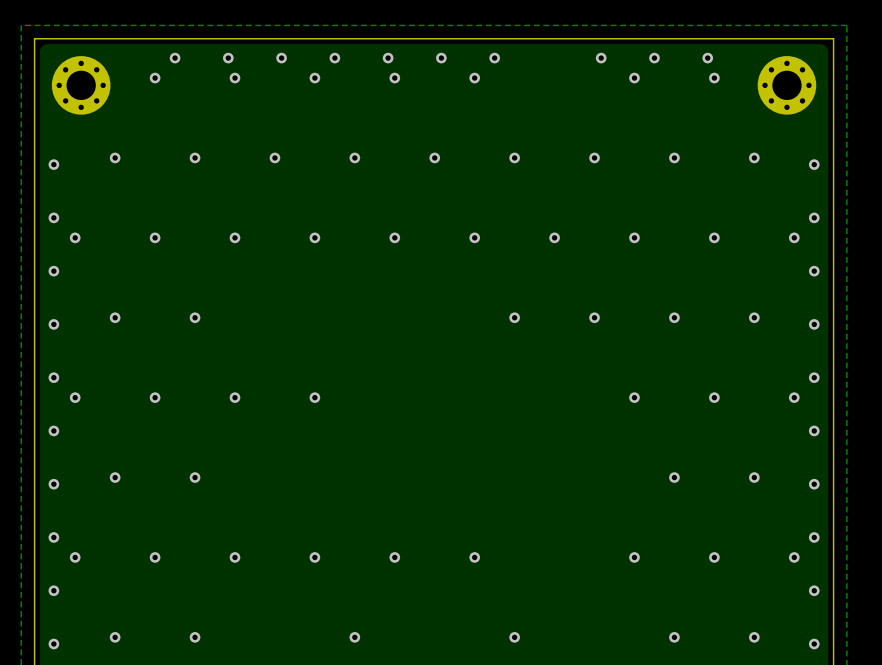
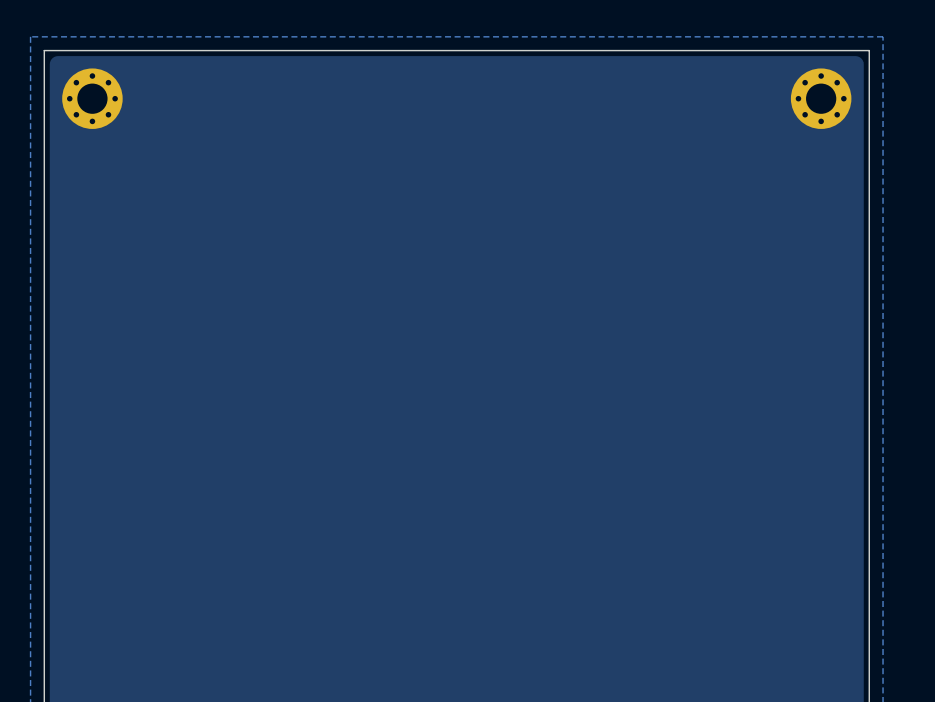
via: (175, 58) -> none
via: (228, 58) -> none
via: (281, 58) -> none
via: (334, 58) -> none
via: (388, 58) -> none
via: (441, 58) -> none
via: (494, 58) -> none
via: (601, 58) -> none
via: (654, 58) -> none
via: (707, 58) -> none
via: (155, 78) -> none
via: (234, 78) -> none
via: (314, 78) -> none
via: (394, 78) -> none
via: (474, 78) -> none
via: (634, 78) -> none
via: (714, 78) -> none
via: (115, 157) -> none
via: (195, 157) -> none
via: (274, 157) -> none
via: (354, 157) -> none
via: (434, 157) -> none
via: (514, 157) -> none
via: (594, 157) -> none
via: (674, 157) -> none
via: (754, 157) -> none
via: (53, 164) -> none
via: (814, 164) -> none
via: (53, 217) -> none
via: (814, 217) -> none
via: (75, 237) -> none
via: (155, 237) -> none
via: (234, 237) -> none
via: (314, 237) -> none
via: (394, 237) -> none
via: (474, 237) -> none
via: (554, 237) -> none
via: (634, 237) -> none
via: (714, 237) -> none
via: (794, 237) -> none
via: (53, 271) -> none
via: (814, 271) -> none
via: (115, 317) -> none
via: (195, 317) -> none
via: (514, 317) -> none
via: (594, 317) -> none
via: (674, 317) -> none
via: (754, 317) -> none
via: (53, 324) -> none
via: (814, 324) -> none
via: (53, 377) -> none
via: (814, 377) -> none
via: (75, 397) -> none
via: (155, 397) -> none
via: (234, 397) -> none
via: (314, 397) -> none
via: (634, 397) -> none
via: (714, 397) -> none
via: (794, 397) -> none
via: (53, 430) -> none
via: (814, 430) -> none
via: (115, 477) -> none
via: (195, 477) -> none
via: (674, 477) -> none
via: (754, 477) -> none
via: (53, 484) -> none
via: (814, 484) -> none
via: (53, 537) -> none
via: (814, 537) -> none
via: (75, 557) -> none
via: (155, 557) -> none
via: (234, 557) -> none
via: (314, 557) -> none
via: (394, 557) -> none
via: (474, 557) -> none
via: (634, 557) -> none
via: (714, 557) -> none
via: (794, 557) -> none
via: (53, 590) -> none
via: (814, 590) -> none
via: (115, 637) -> none
via: (195, 637) -> none
via: (354, 637) -> none
via: (514, 637) -> none
via: (674, 637) -> none
via: (754, 637) -> none
via: (53, 644) -> none
via: (814, 644) -> none

